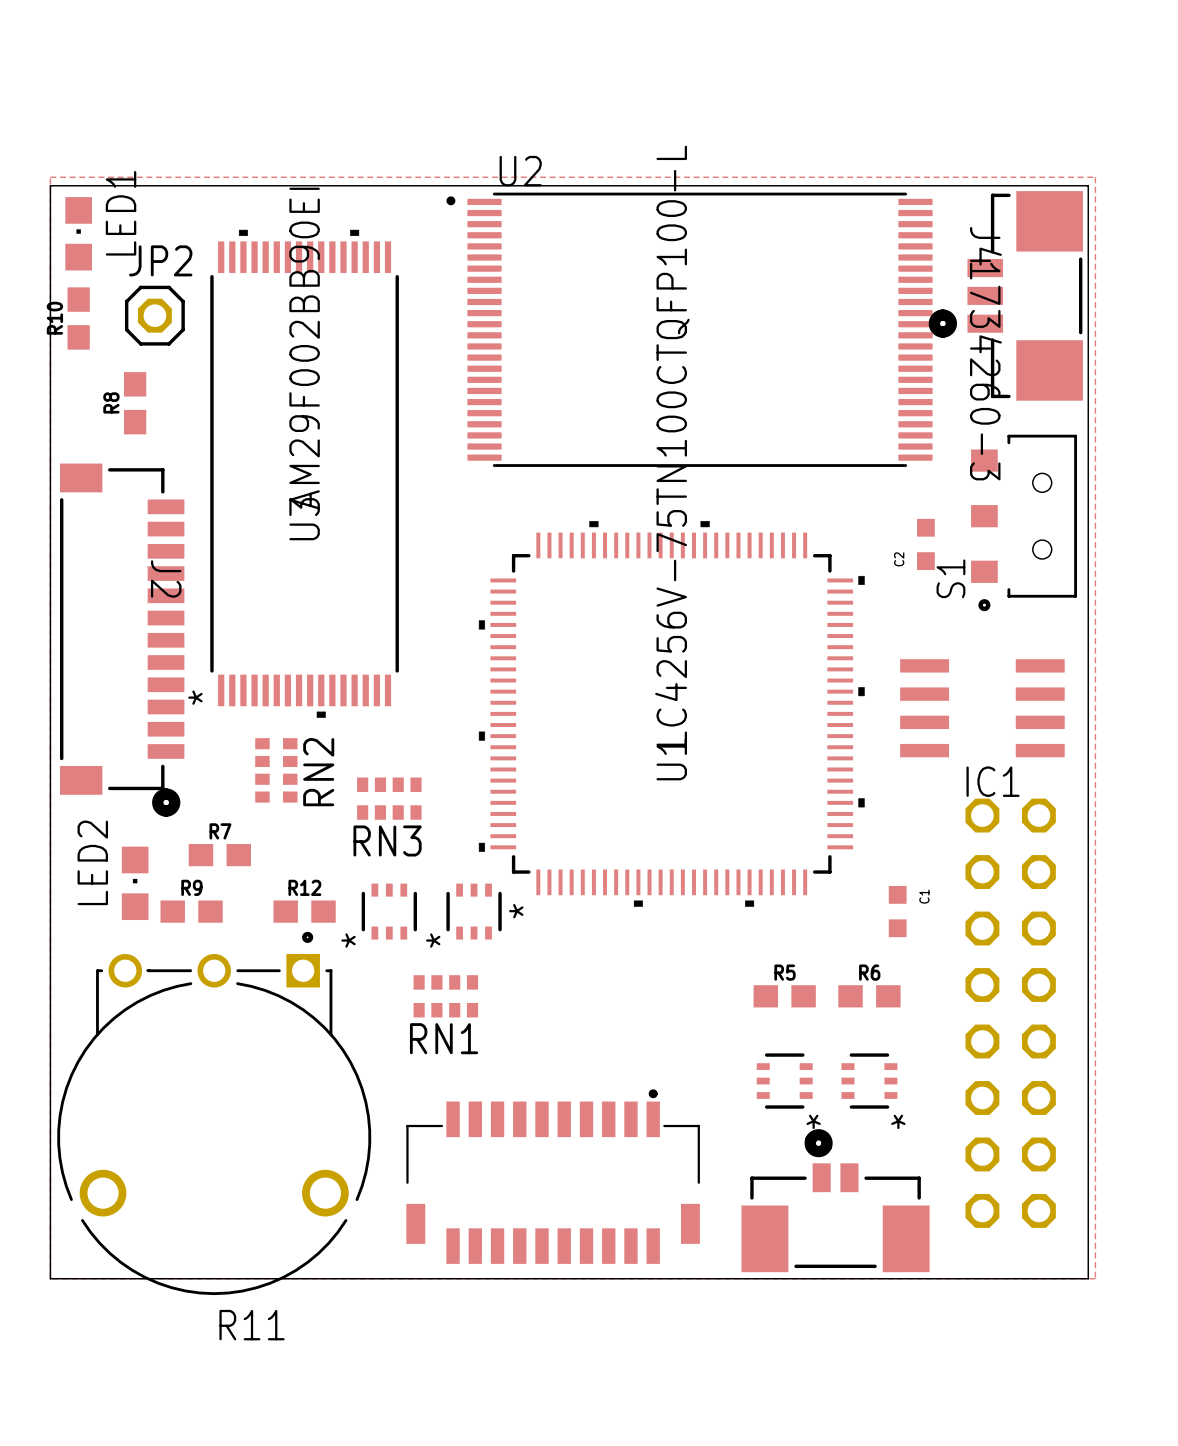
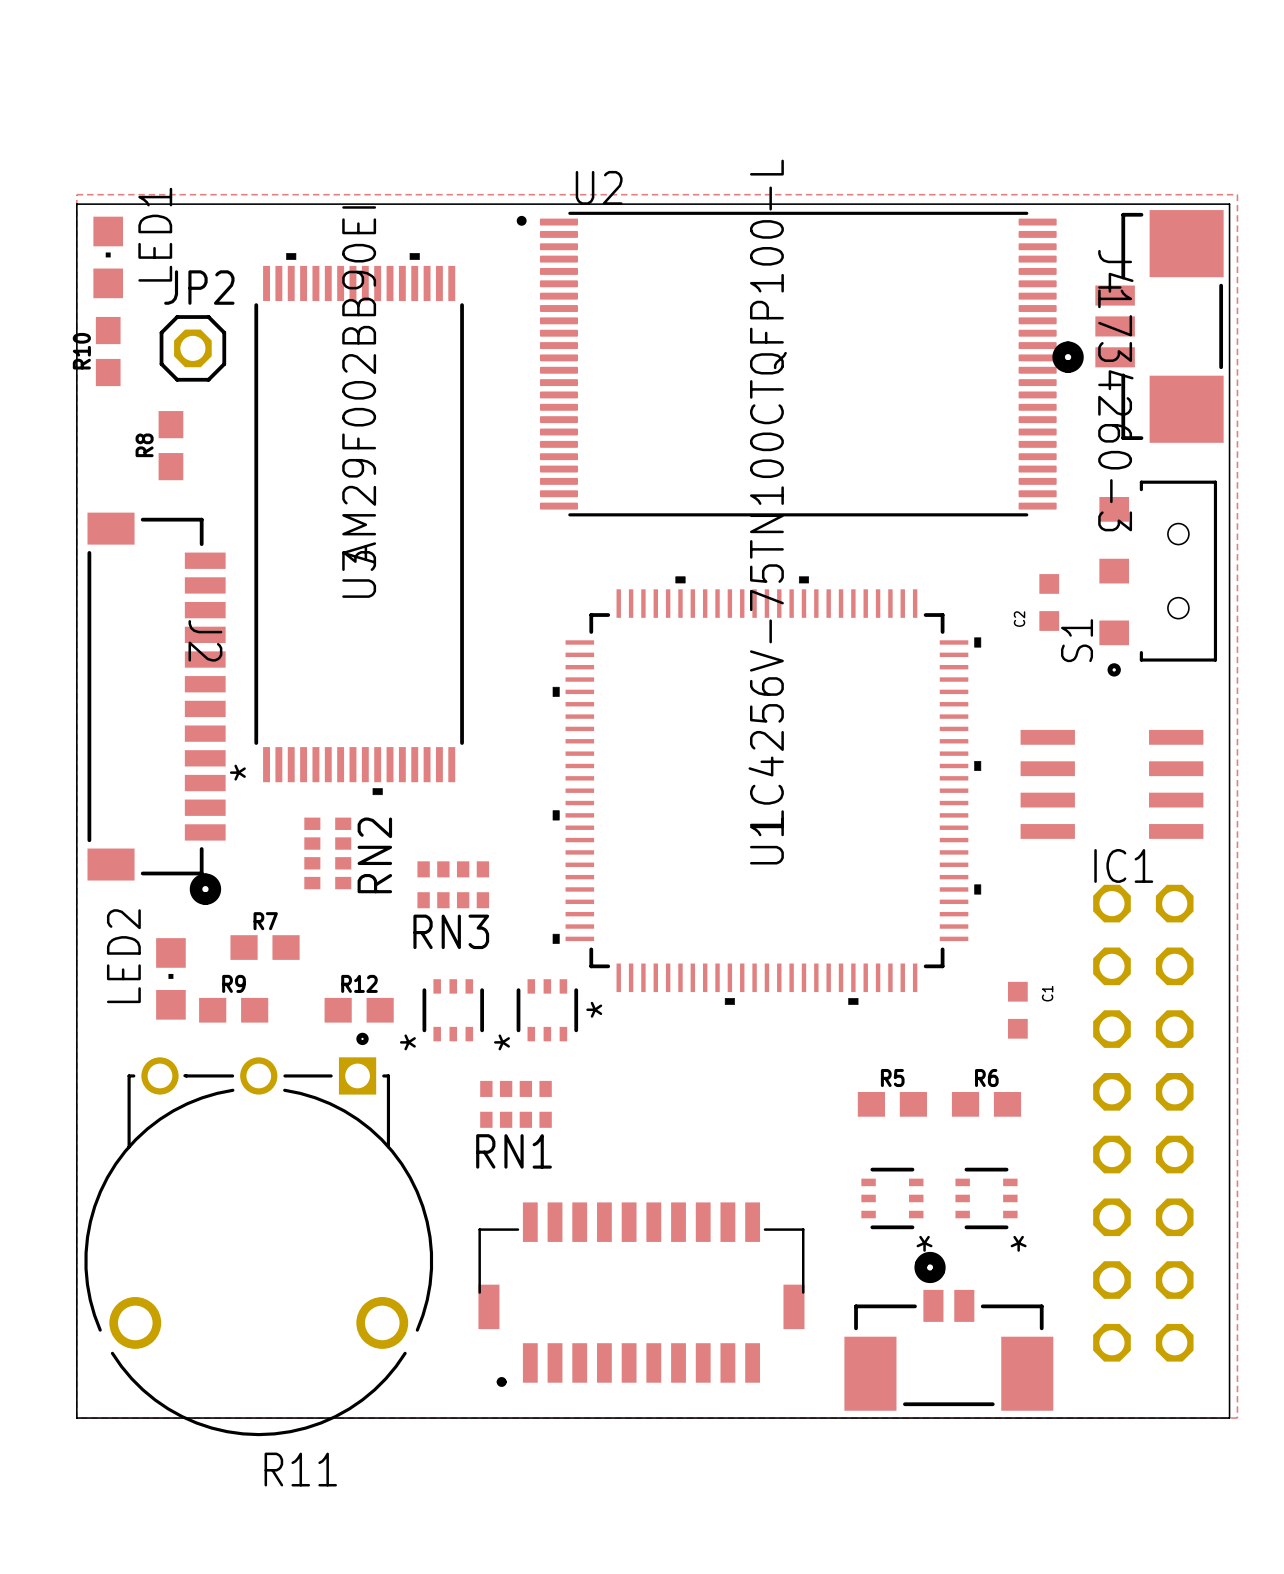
part footprint: [406, 1089, 700, 1264] -> [478, 1202, 805, 1387]

